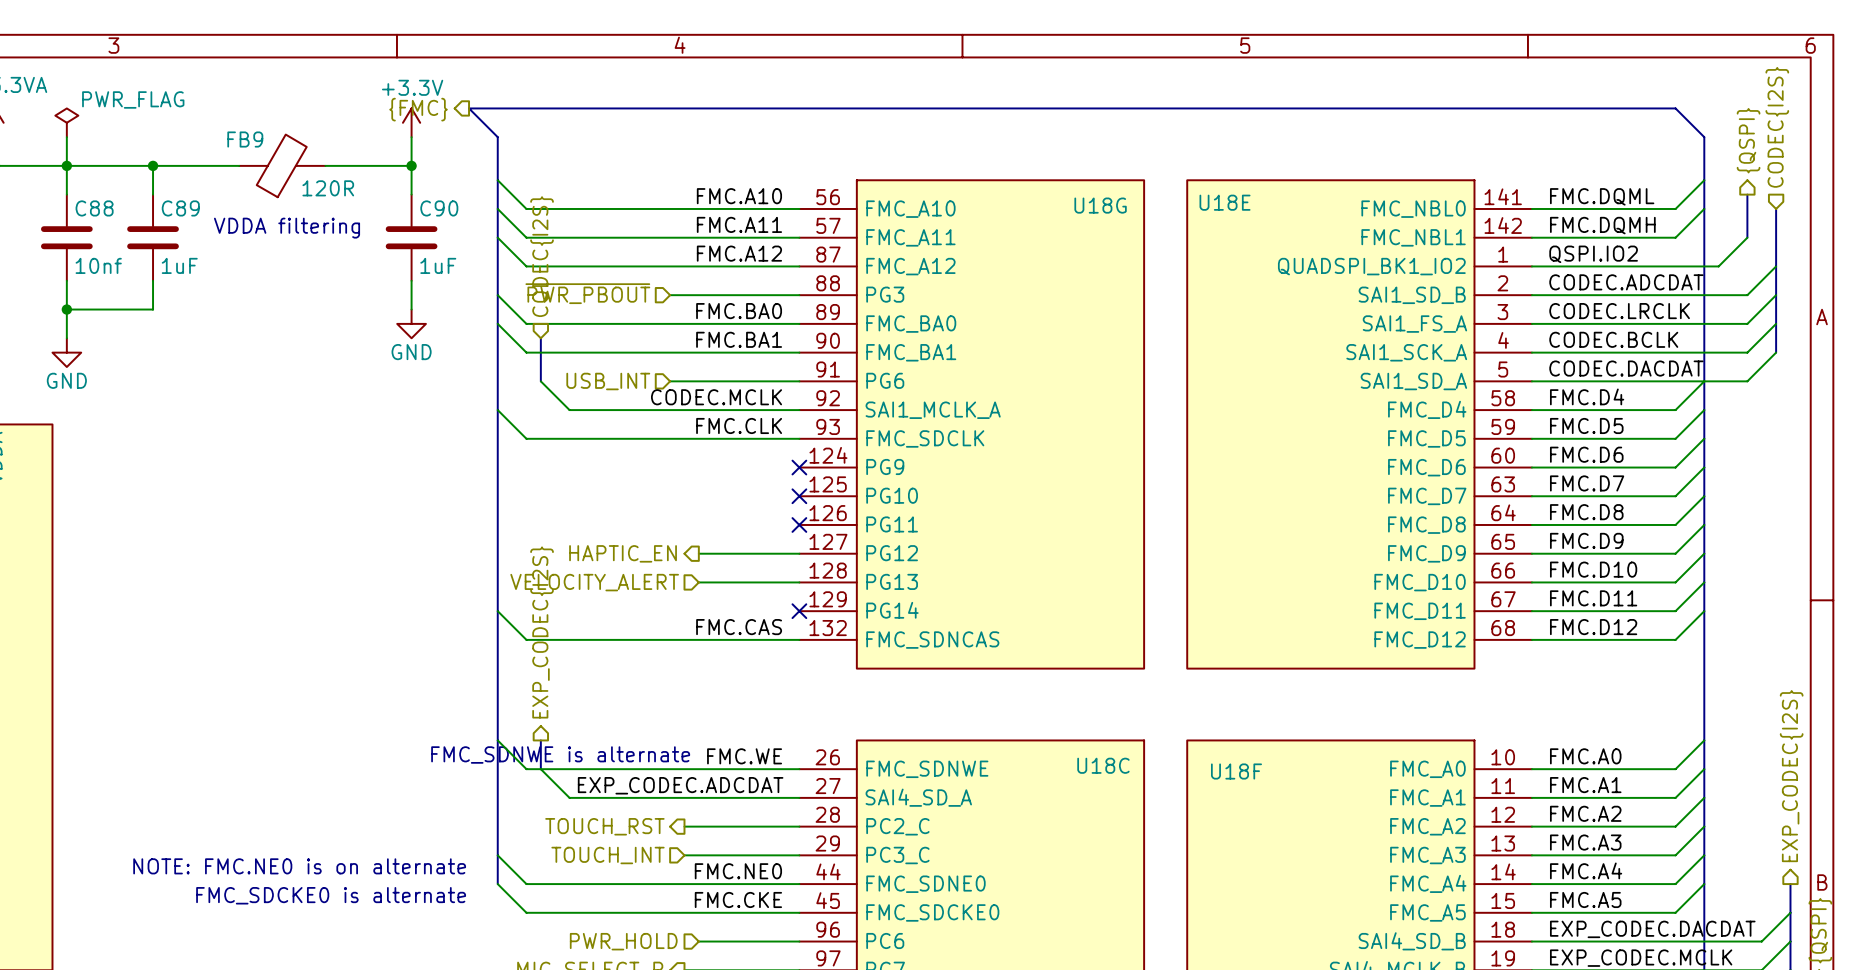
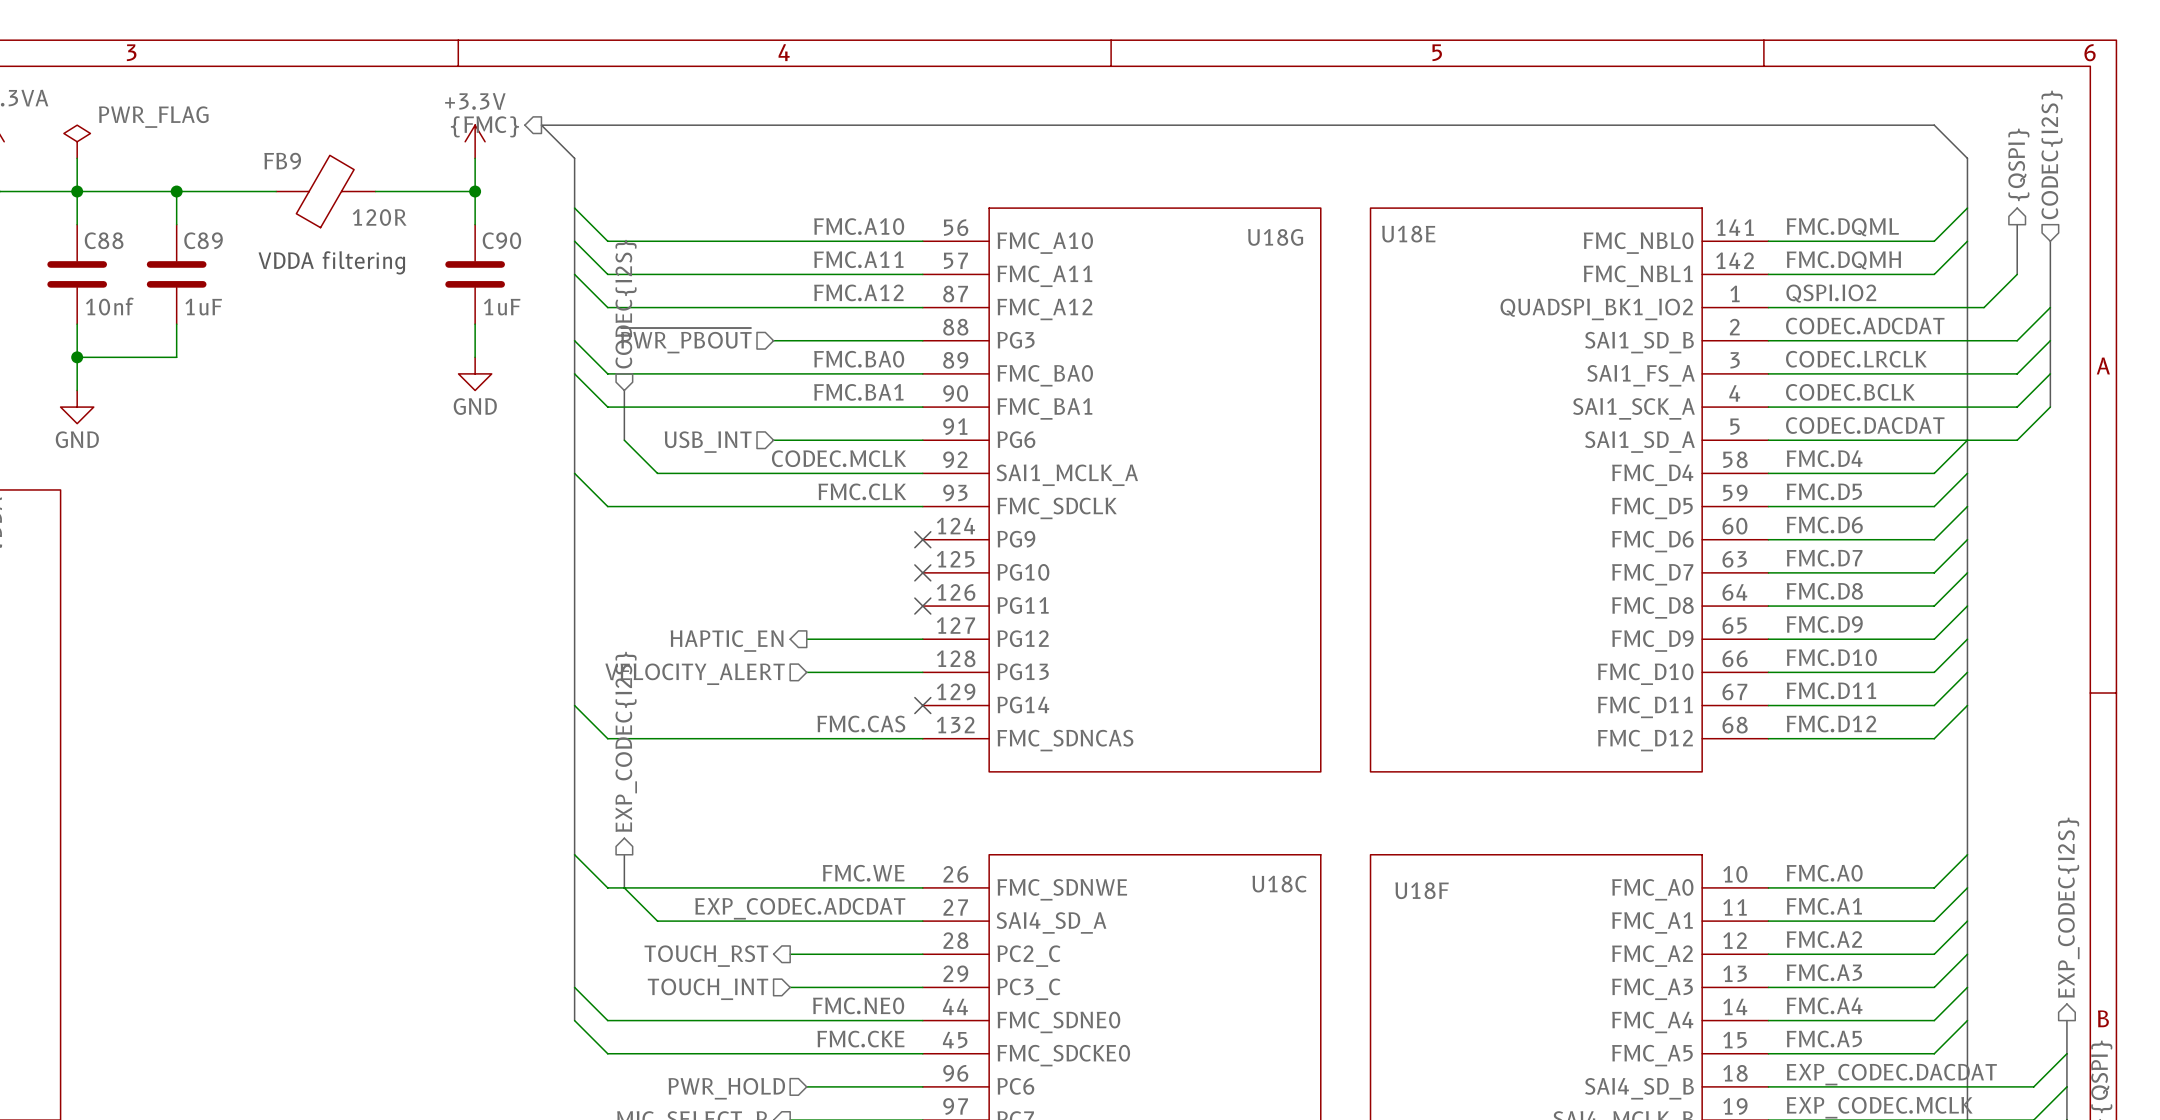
text: FMC_SDNWE is alternate (560, 755) -> none
text: NOTE: FMC.NE0 is on alternate (299, 866) -> none
text: FMC_SDCKE0 is alternate (331, 895) -> none

